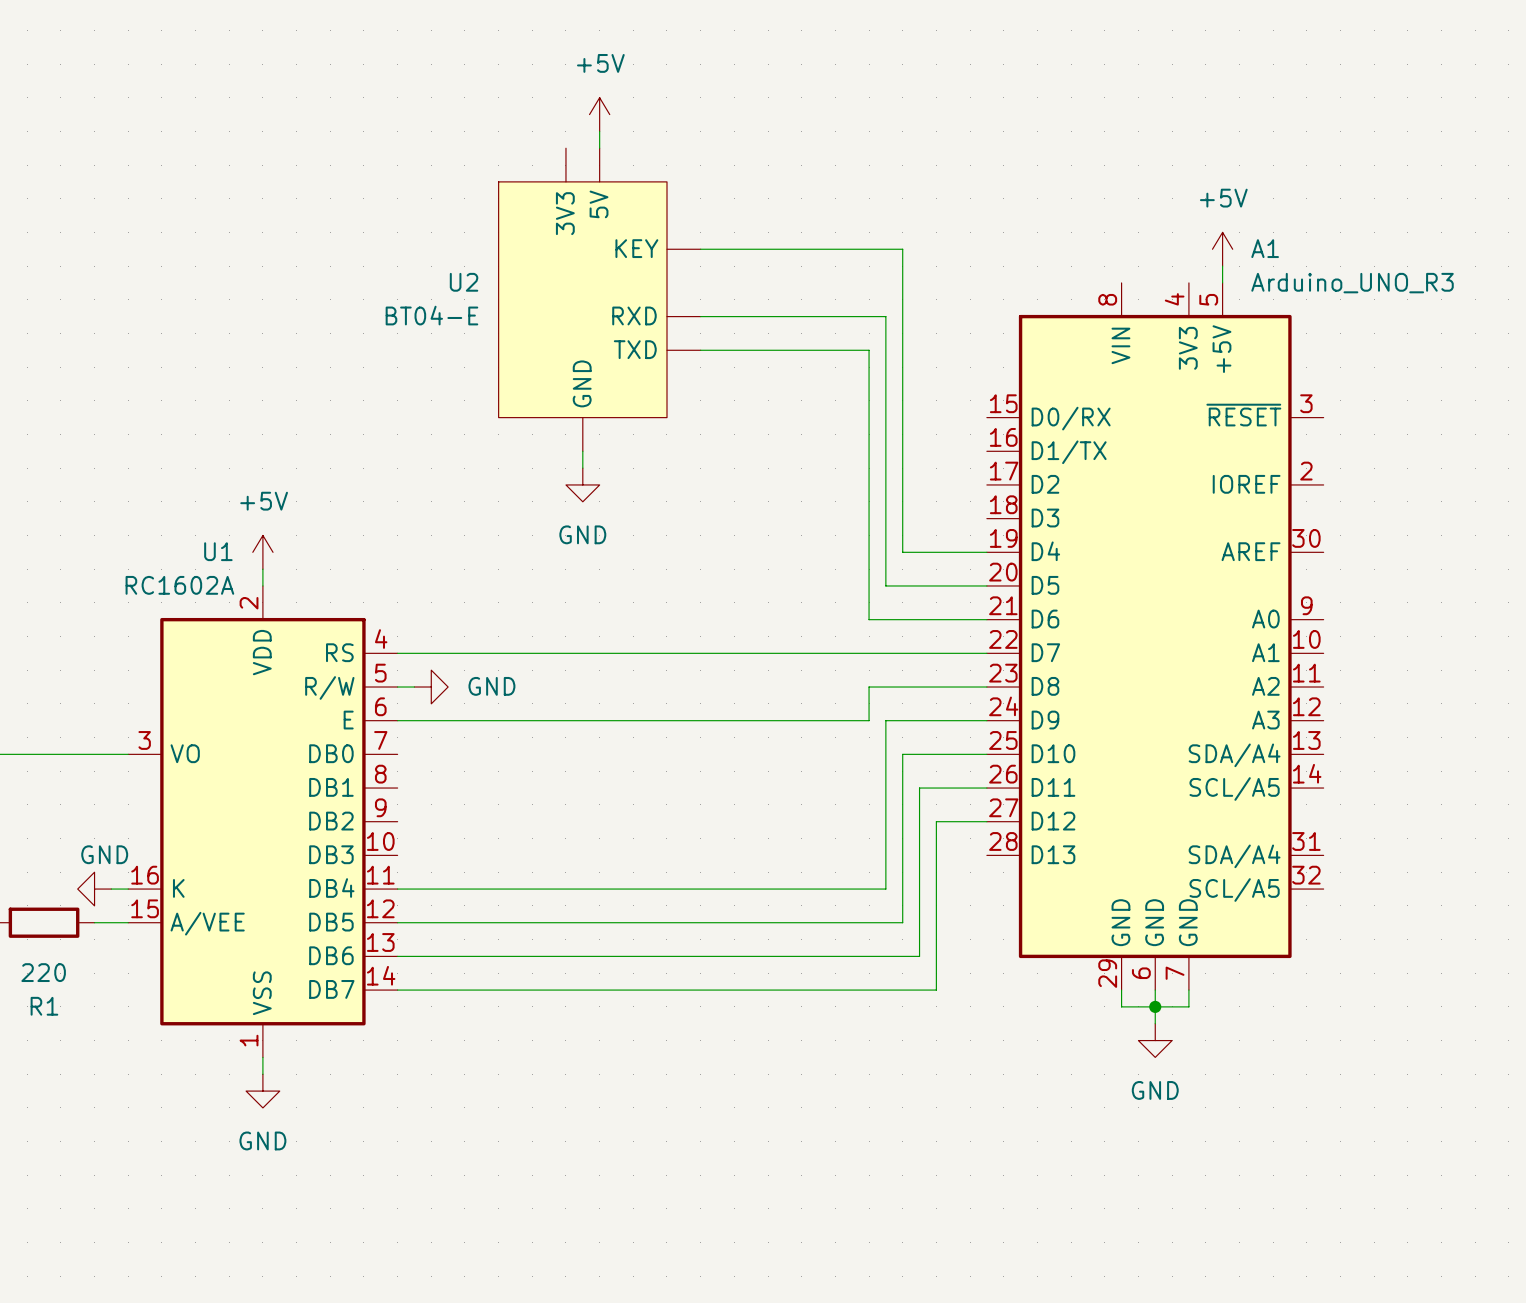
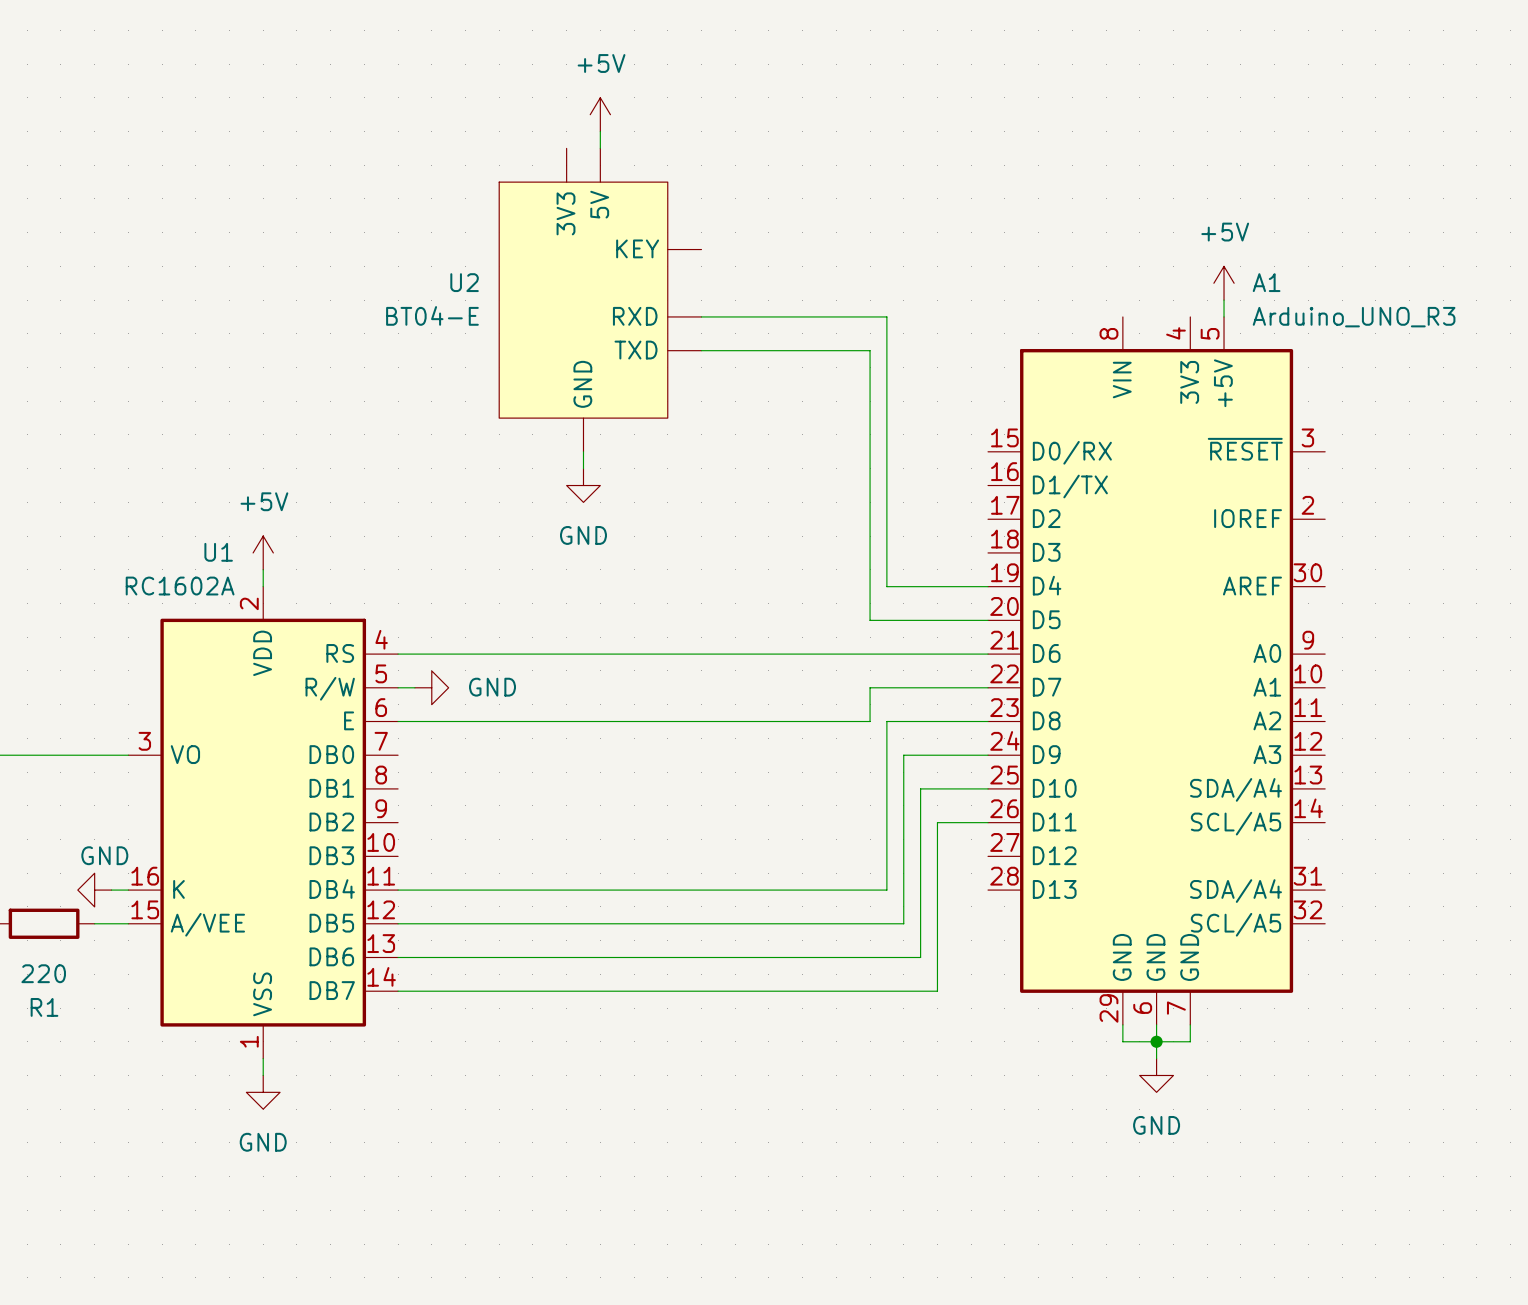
wire: (700, 249) (902, 249) (902, 552) (986, 552) -> none
power symbol position: +5V (1222, 249) -> +5V (1224, 283)
A1 position: (1155, 636) -> (1156, 670)
wire: (1121, 990) (1121, 1006) (1188, 1006) (1188, 990) -> (1122, 1024) (1122, 1041) (1190, 1041) (1190, 1024)
junction position: (1155, 1006) -> (1156, 1041)
power symbol position: GND (1155, 1040) -> GND (1156, 1075)

